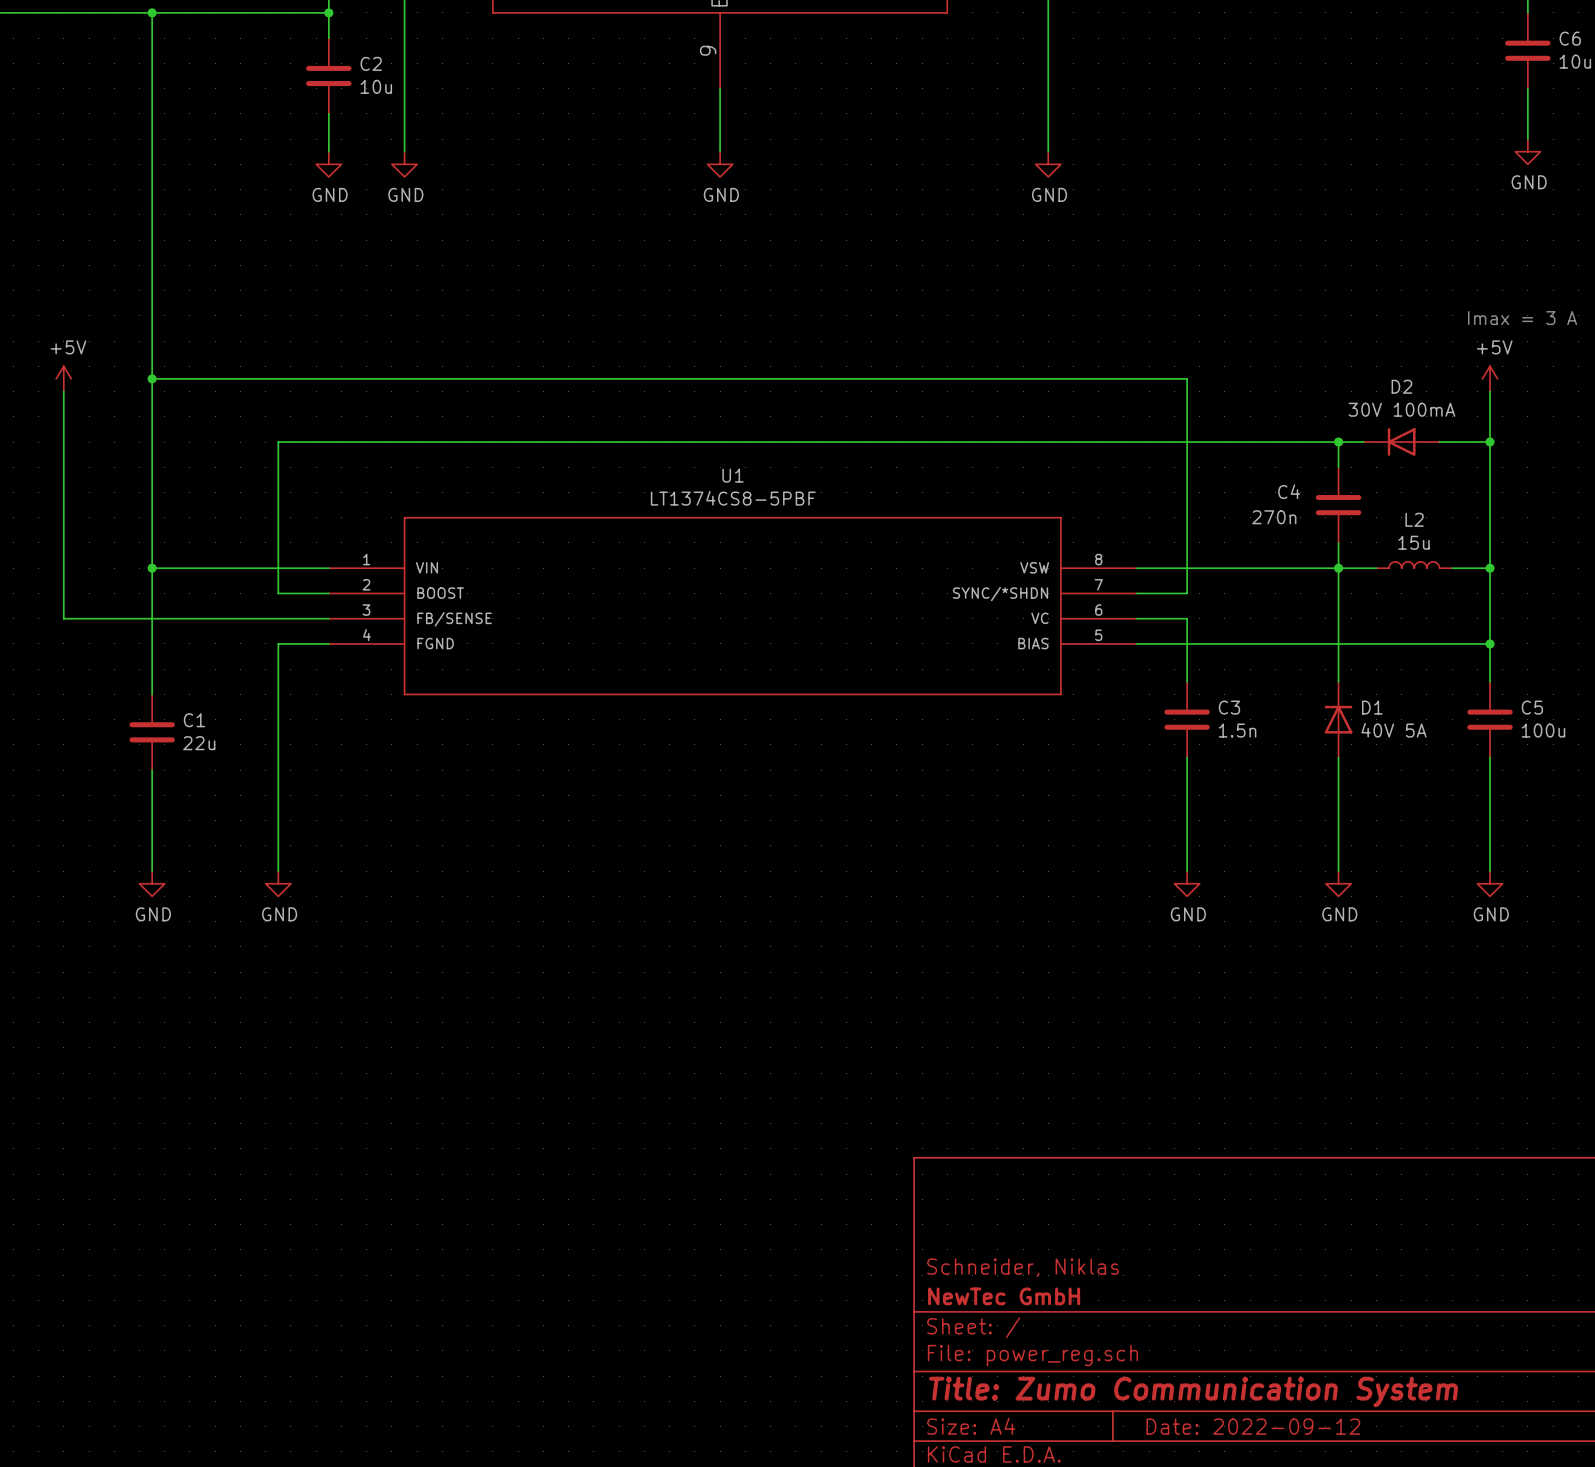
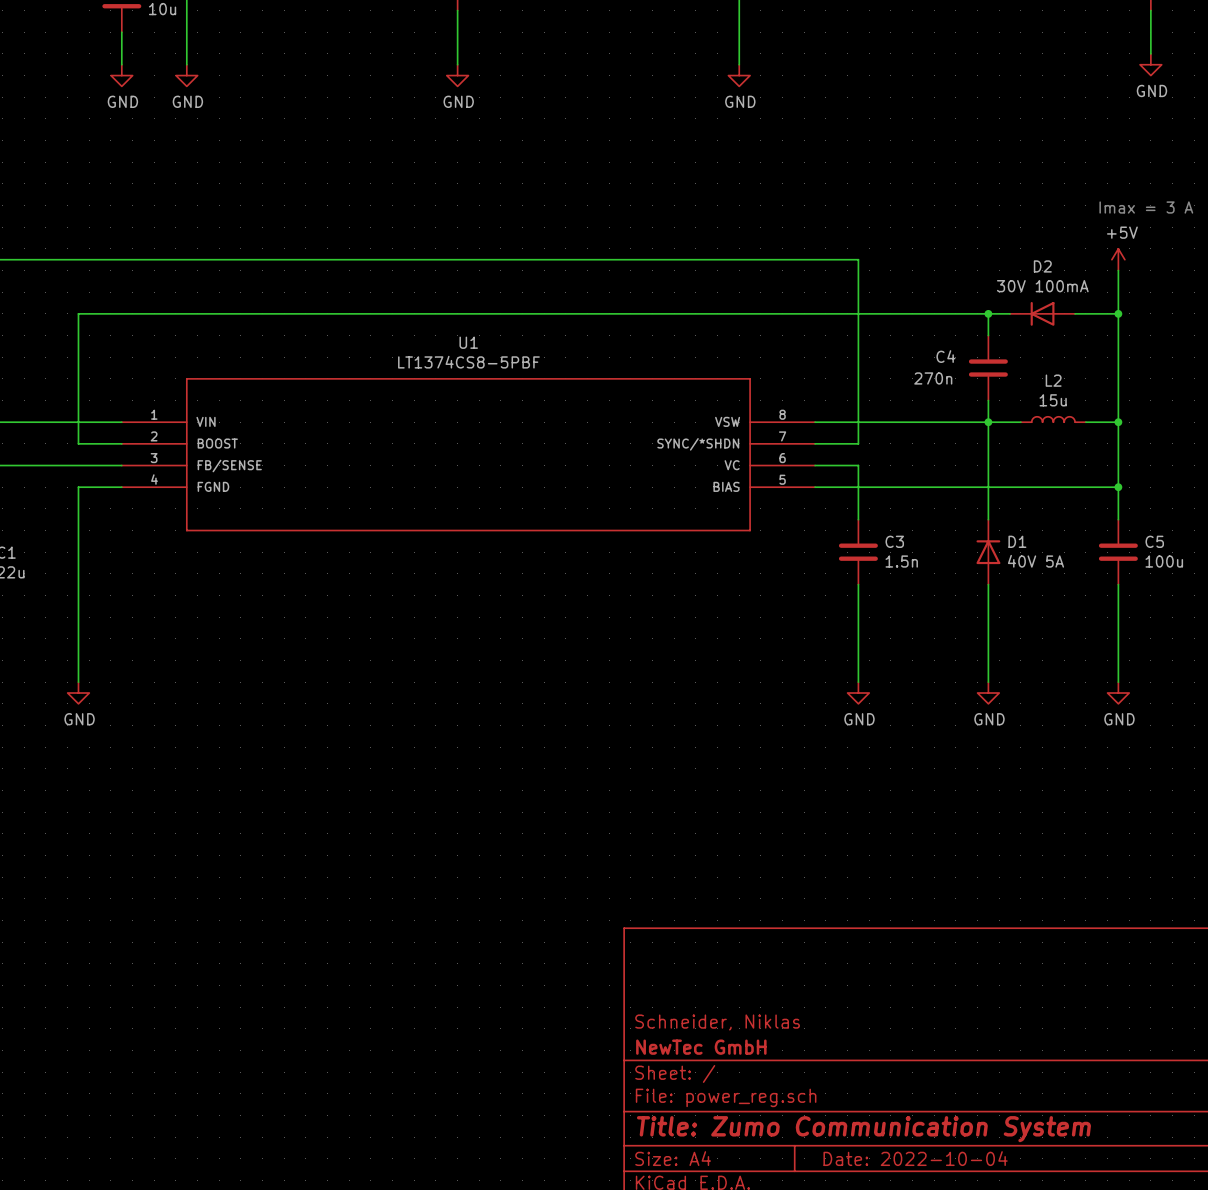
title block: Date: 2022-09-12 (1253, 1426) -> Date: 2022-10-04 (915, 1158)

